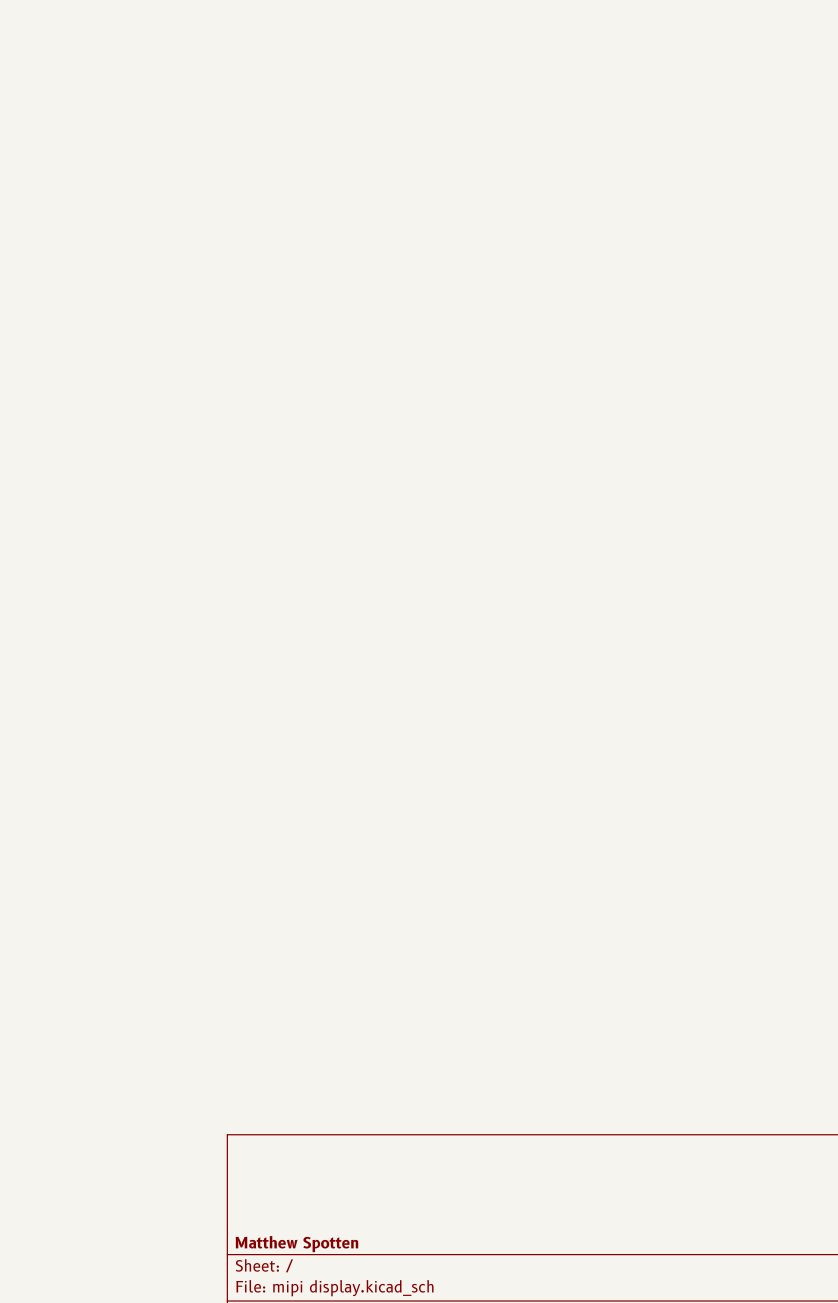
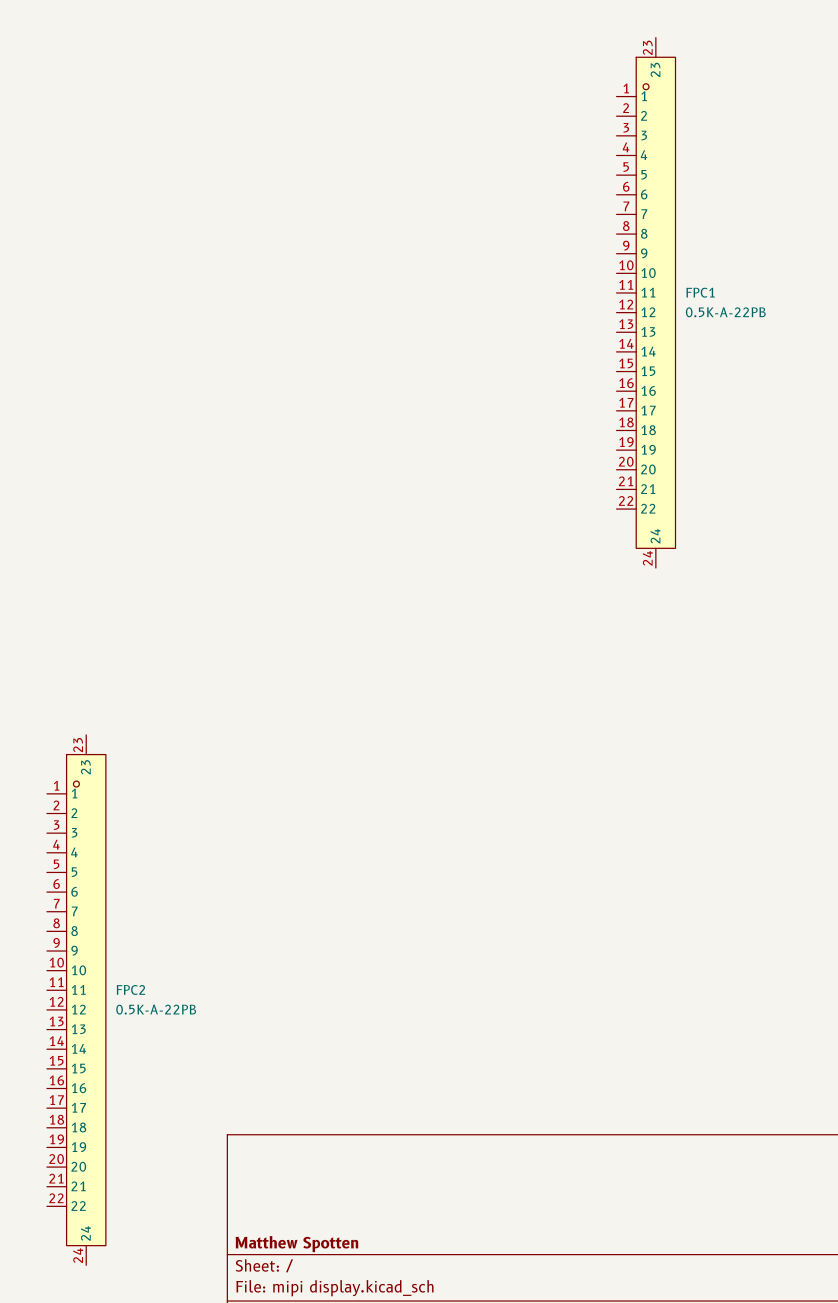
FPC1: none -> 0.5K-A-22PB (646, 302)
FPC2: none -> 0.5K-A-22PB (76, 1000)

